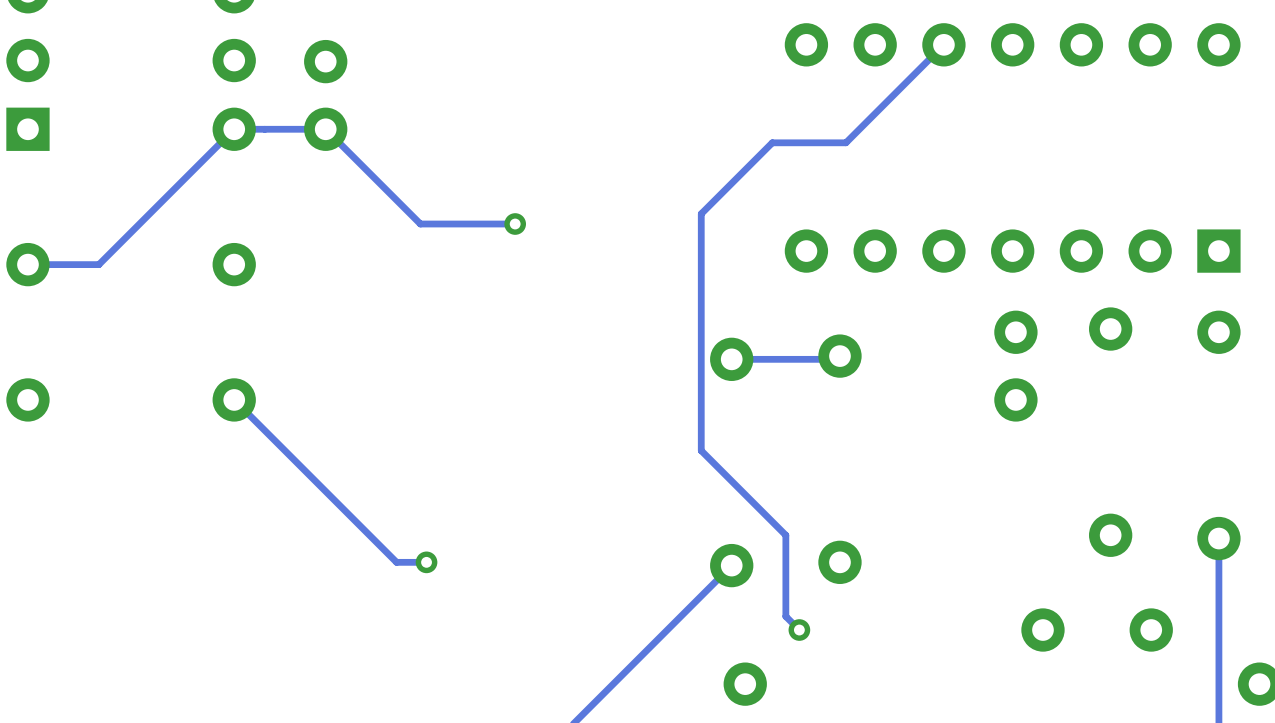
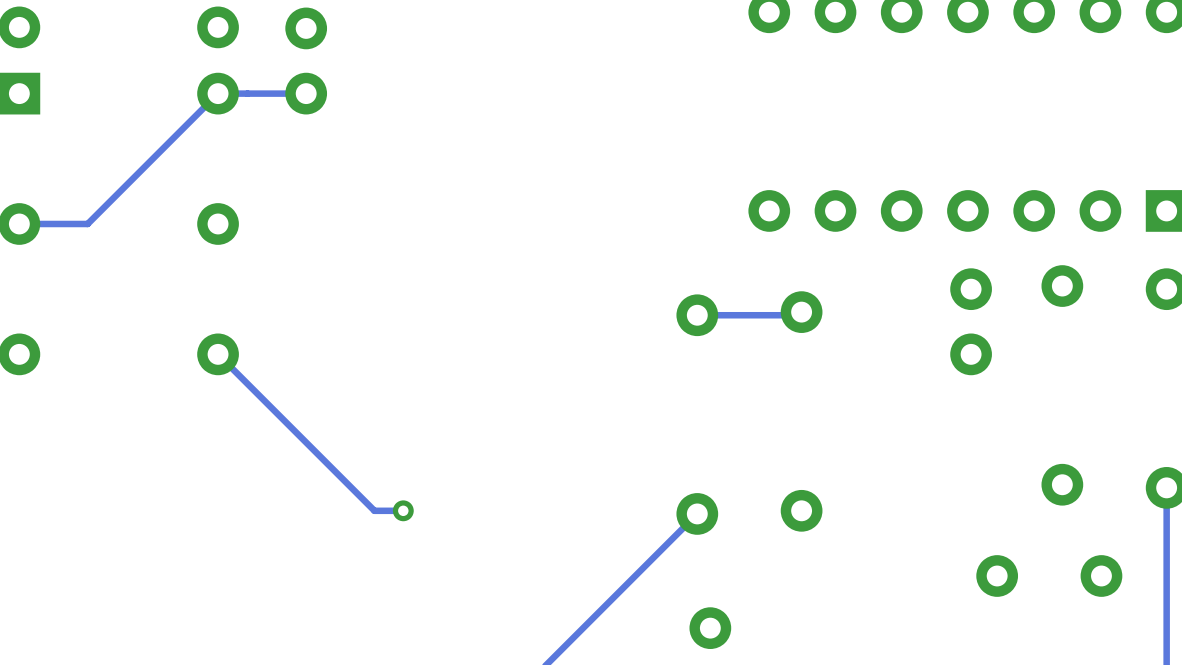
track: (943, 44) (845, 142) (772, 142) (701, 213) (701, 450) (785, 535) (785, 616) (799, 630) -> none
track: (325, 129) (420, 224) (515, 224) -> none
via: (515, 224) -> none
via: (799, 630) -> none

